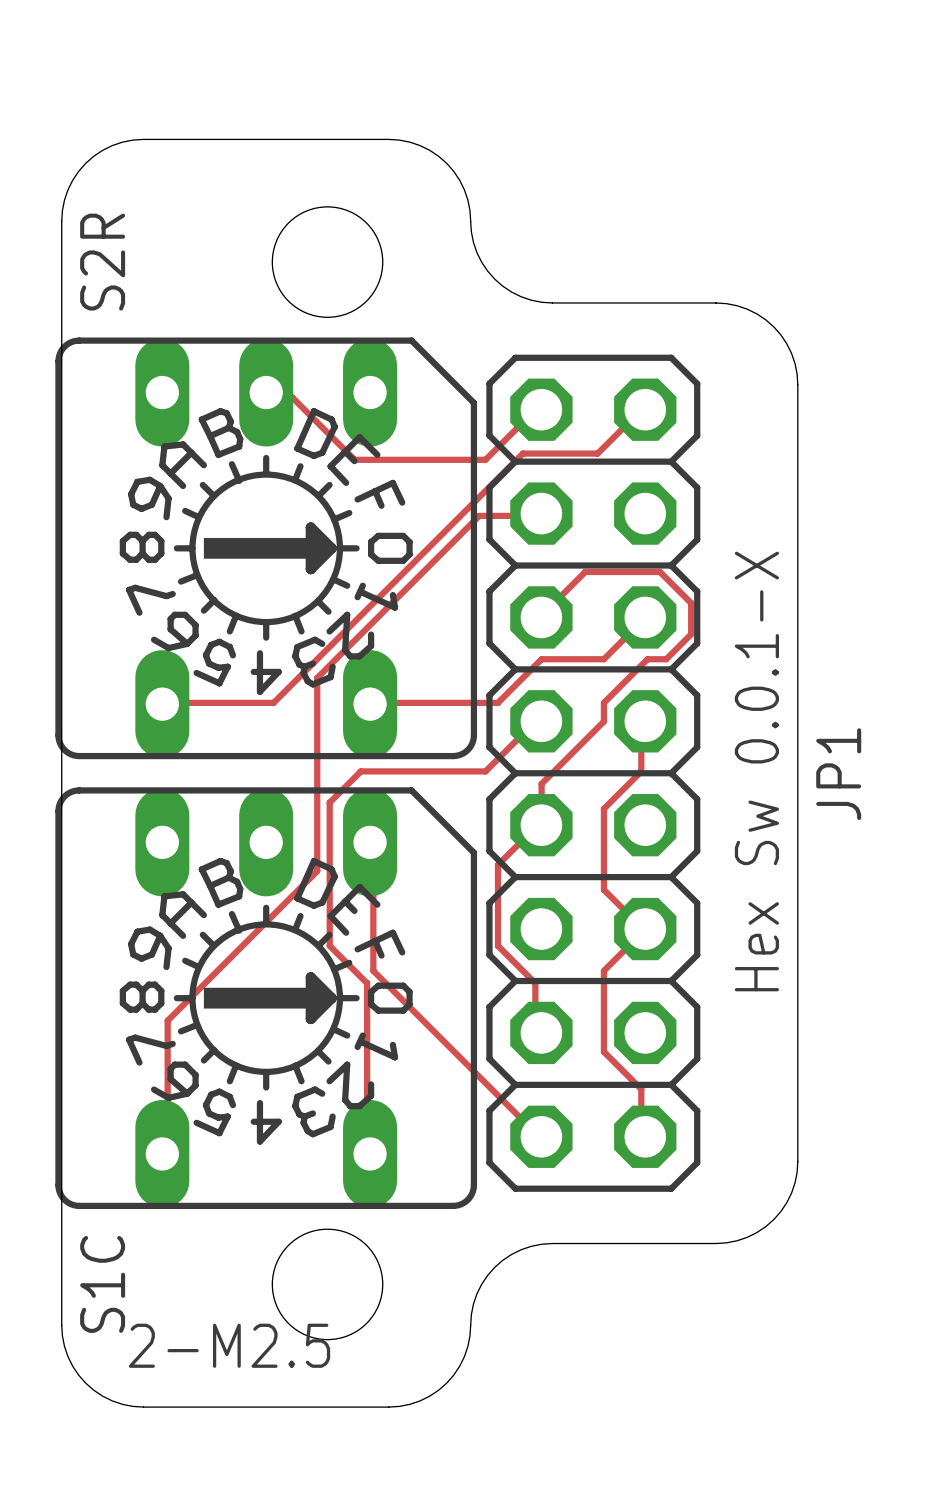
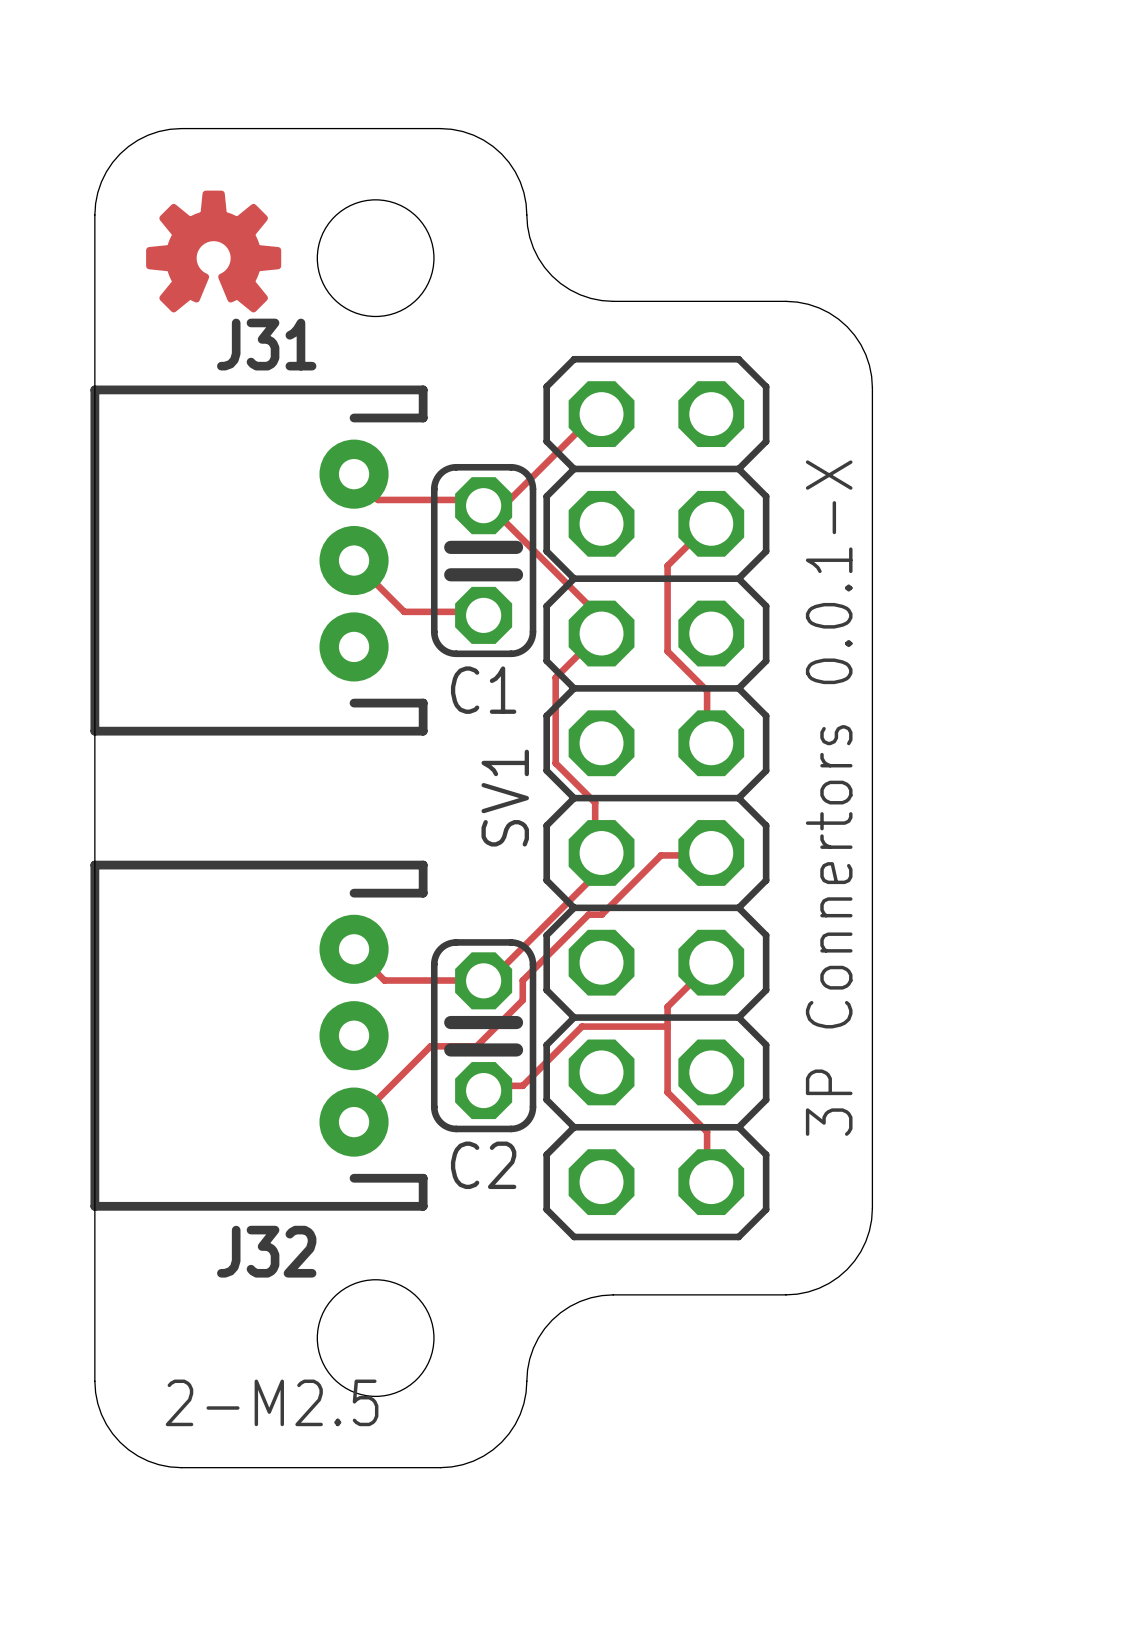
drawing: none -> [146, 190, 282, 313]
track: (266, 392) (267, 397) (292, 397) (354, 459) (485, 459) -> (483, 505) (496, 513) (542, 467)
track: (645, 409) (641, 409) (597, 453) (522, 453) (273, 702) (162, 704) -> none
track: none -> (354, 474) (377, 499) (483, 499) (483, 505)
track: (541, 513) (535, 515) (479, 515) (317, 677) (317, 871) (167, 1020) (167, 1151) (162, 1153) -> none
J31: none -> (259, 560)
S2R: (266, 548) -> none
track: none -> (354, 560) (404, 611) (483, 611) (483, 615)
C1: none -> (483, 560)
track: (541, 617) (585, 571) (660, 571) (691, 603) (691, 634) (666, 659) (647, 659) (603, 702) (603, 721) (541, 783) (541, 825) -> (483, 505) (489, 506) (595, 611) (595, 631) (601, 633) (555, 677) (555, 763) (595, 802) (595, 848) (601, 852)
track: (645, 617) (603, 659) (541, 659) (497, 702) (370, 704) -> none
track: (541, 721) (535, 721) (485, 771) (360, 771) (329, 802) (329, 945) (367, 983) (367, 1151) (370, 1153) -> none
track: (645, 721) (641, 721) (641, 771) (603, 808) (603, 889) (645, 929) -> (711, 743) (707, 736) (707, 690) (667, 651) (667, 565) (711, 523)
text: Hex Sw 0.0.1-X (756, 771) -> 3P Connertors 0.0.1-X (829, 798)
JP1 name: JP1 (838, 774) -> SV1 (505, 798)
track: none -> (711, 852) (707, 855) (661, 855) (601, 914) (588, 914) (522, 980) (522, 1000) (476, 1046) (430, 1046) (354, 1122)
track: (535, 827) (497, 864) (497, 945) (535, 983) (535, 1026) (541, 1032) -> (595, 855) (595, 875) (489, 980) (483, 980)
track: (370, 842) (373, 846) (373, 970) (541, 1136) -> none
track: none -> (354, 949) (384, 980) (483, 980)
track: none -> (667, 1026) (582, 1026) (522, 1085) (489, 1085) (483, 1090)
J32: none -> (259, 1035)
S1C: (266, 998) -> none
C2: none -> (483, 1035)

